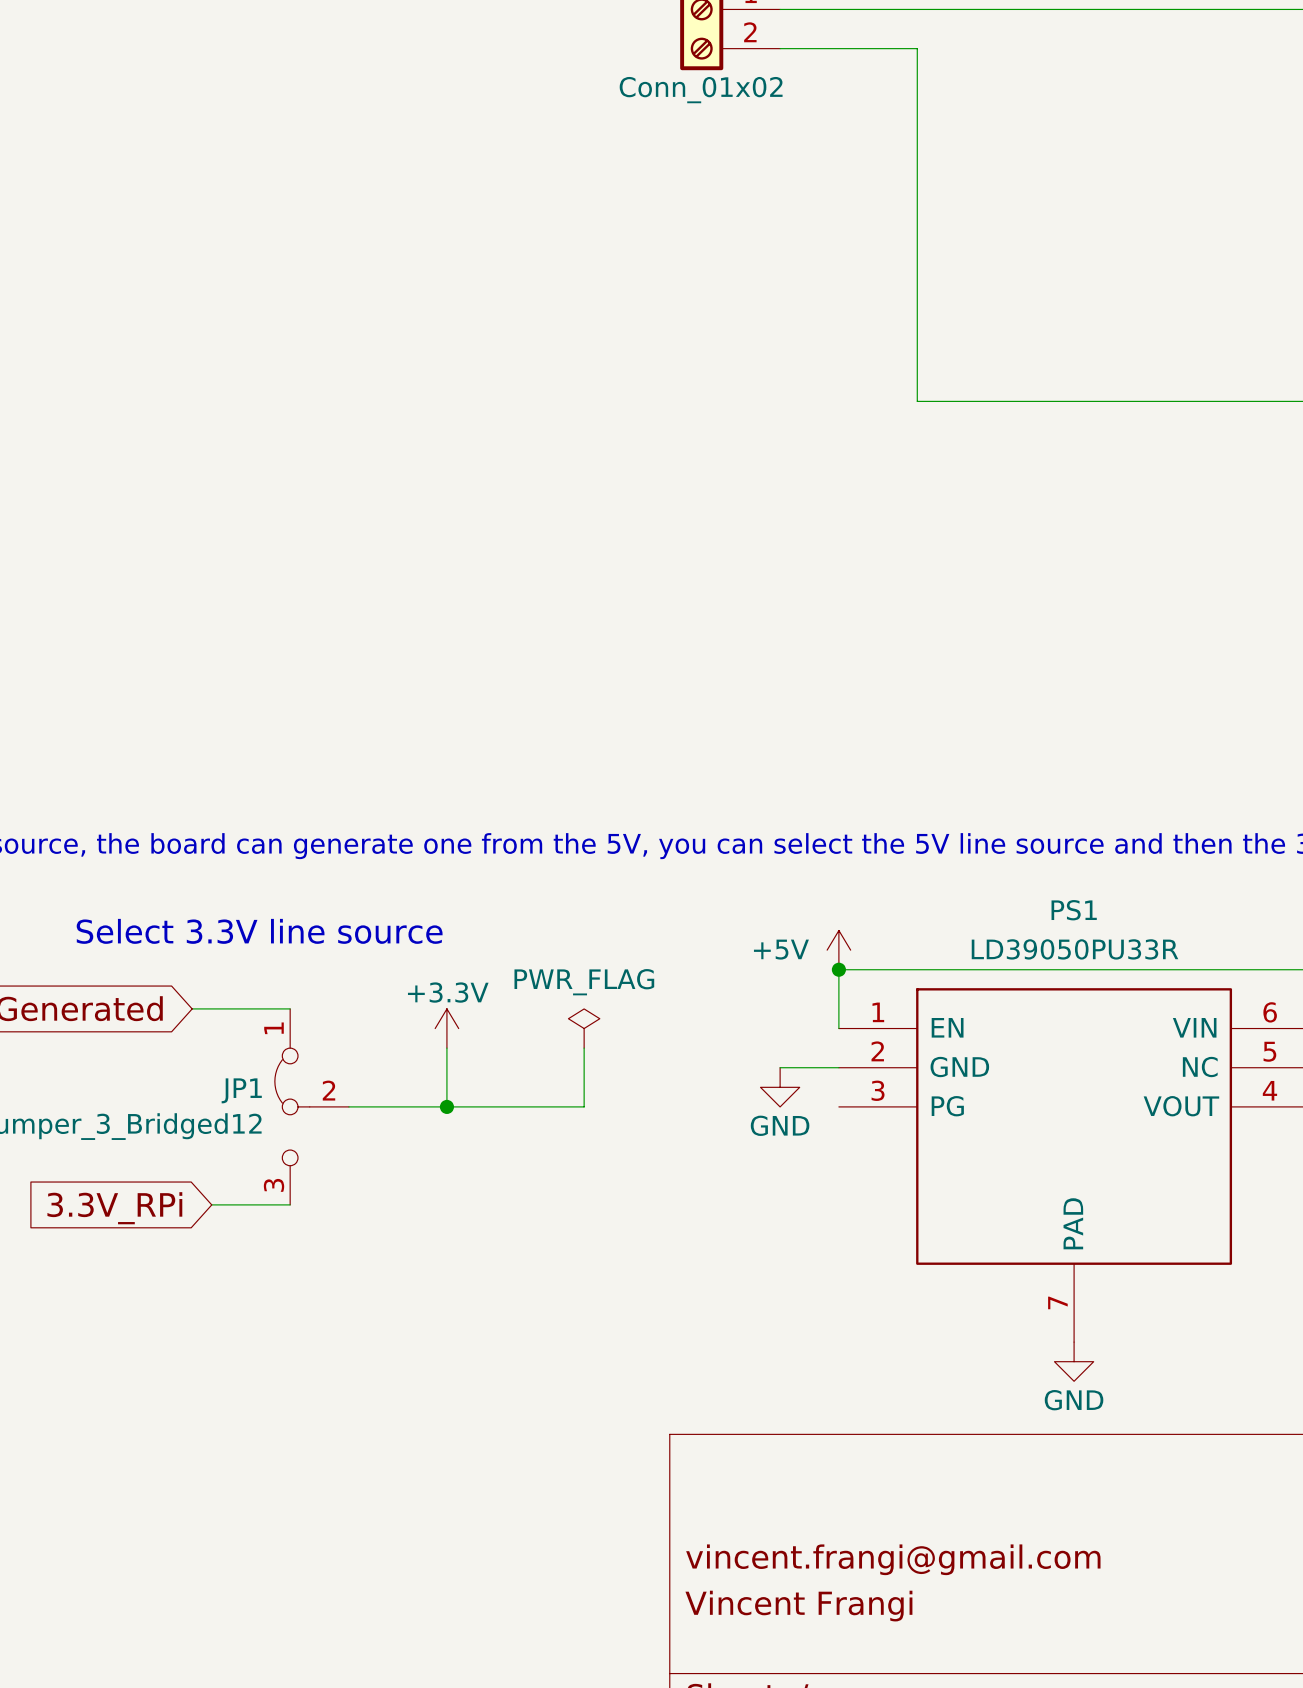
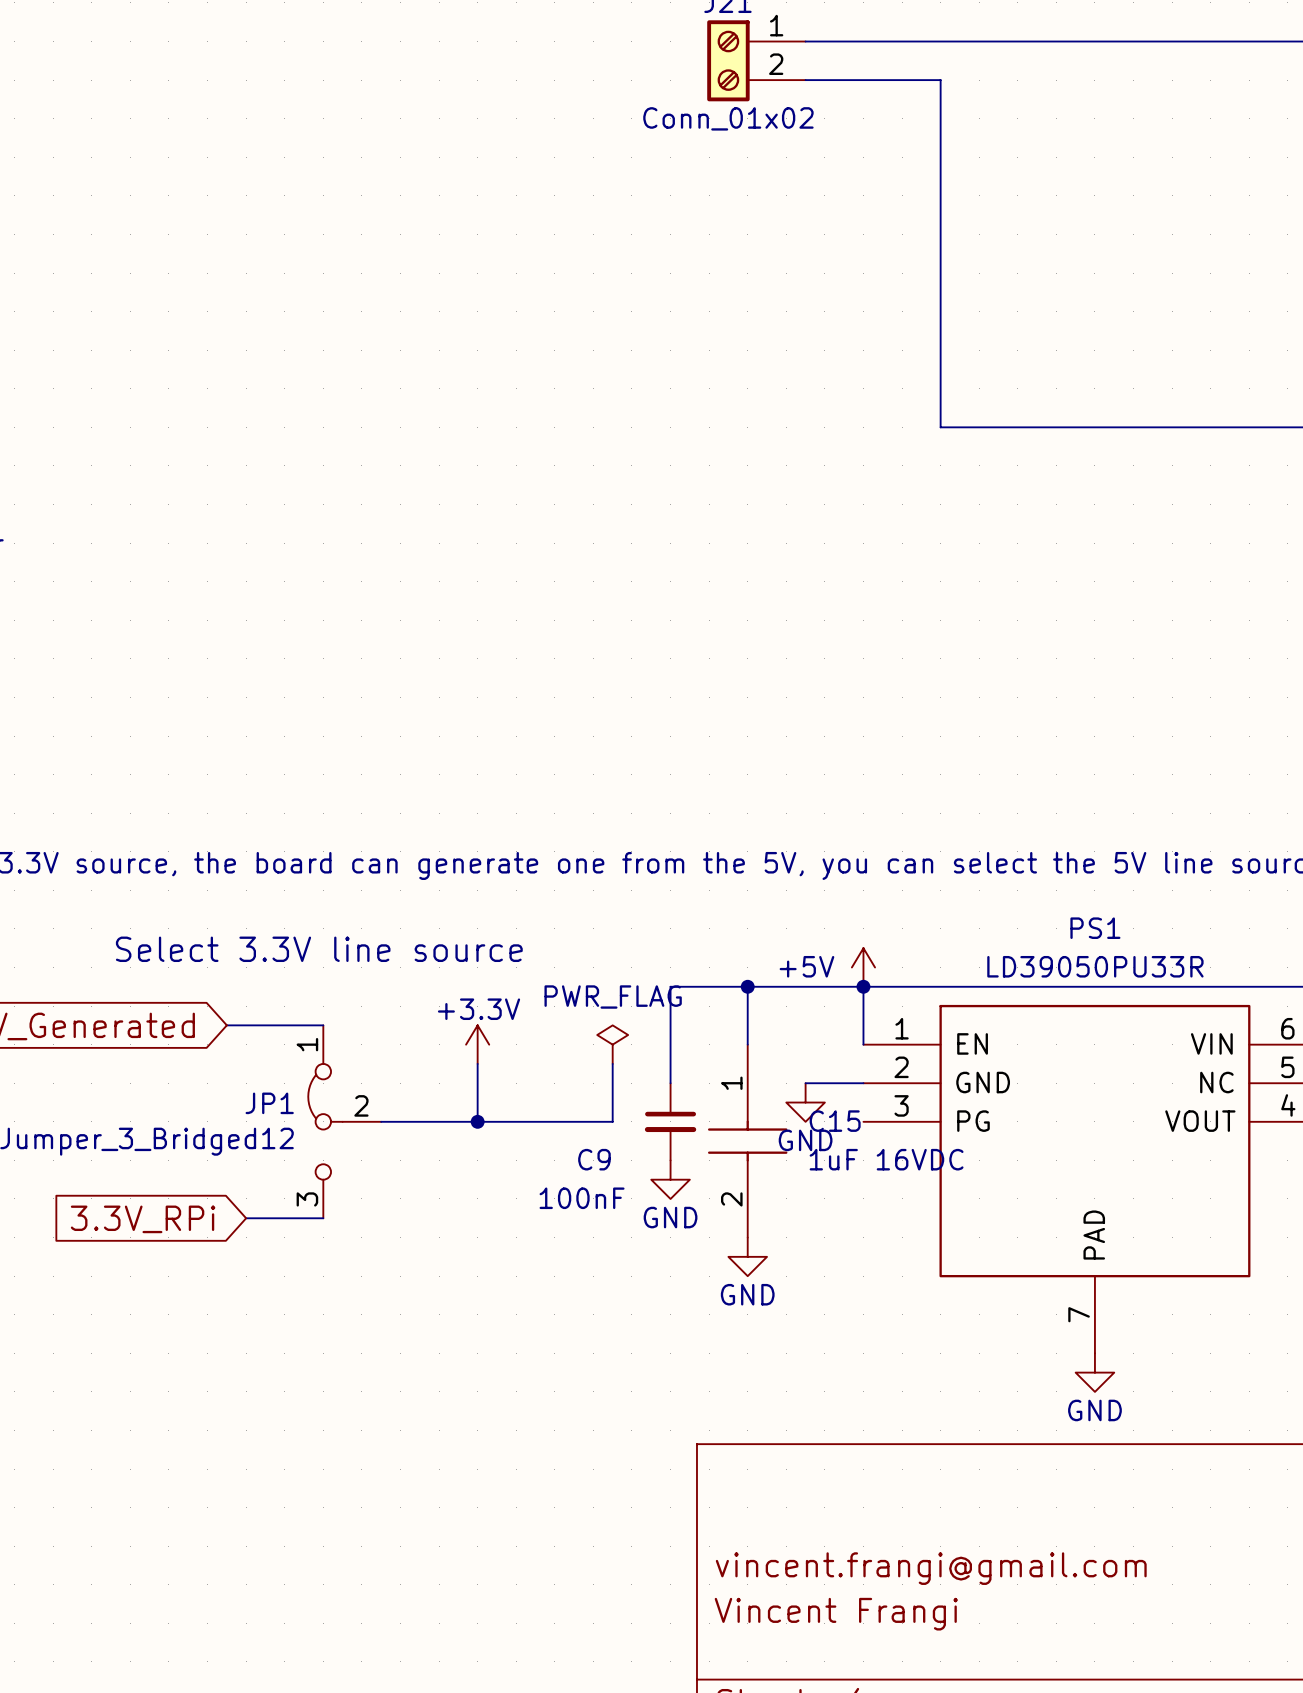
wire: none -> (747, 986) (747, 1044)
junction: none -> (747, 986)
wire: none -> (863, 986) (670, 986) (670, 1083)
C9: none -> 100nF (670, 1121)
C15: none -> 1uF 16VDC (747, 1141)
power symbol: none -> GND (670, 1179)
power symbol: none -> GND (747, 1256)

